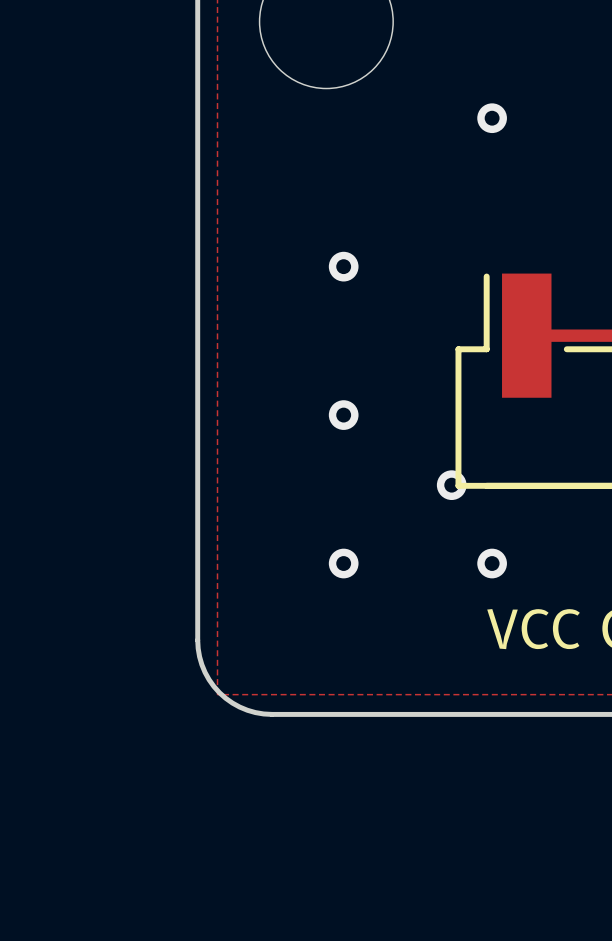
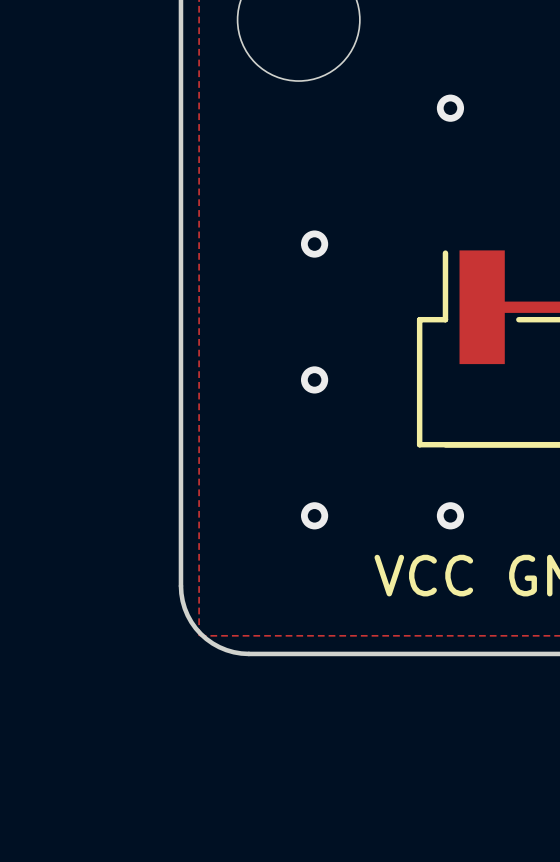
via: (451, 485) -> none

